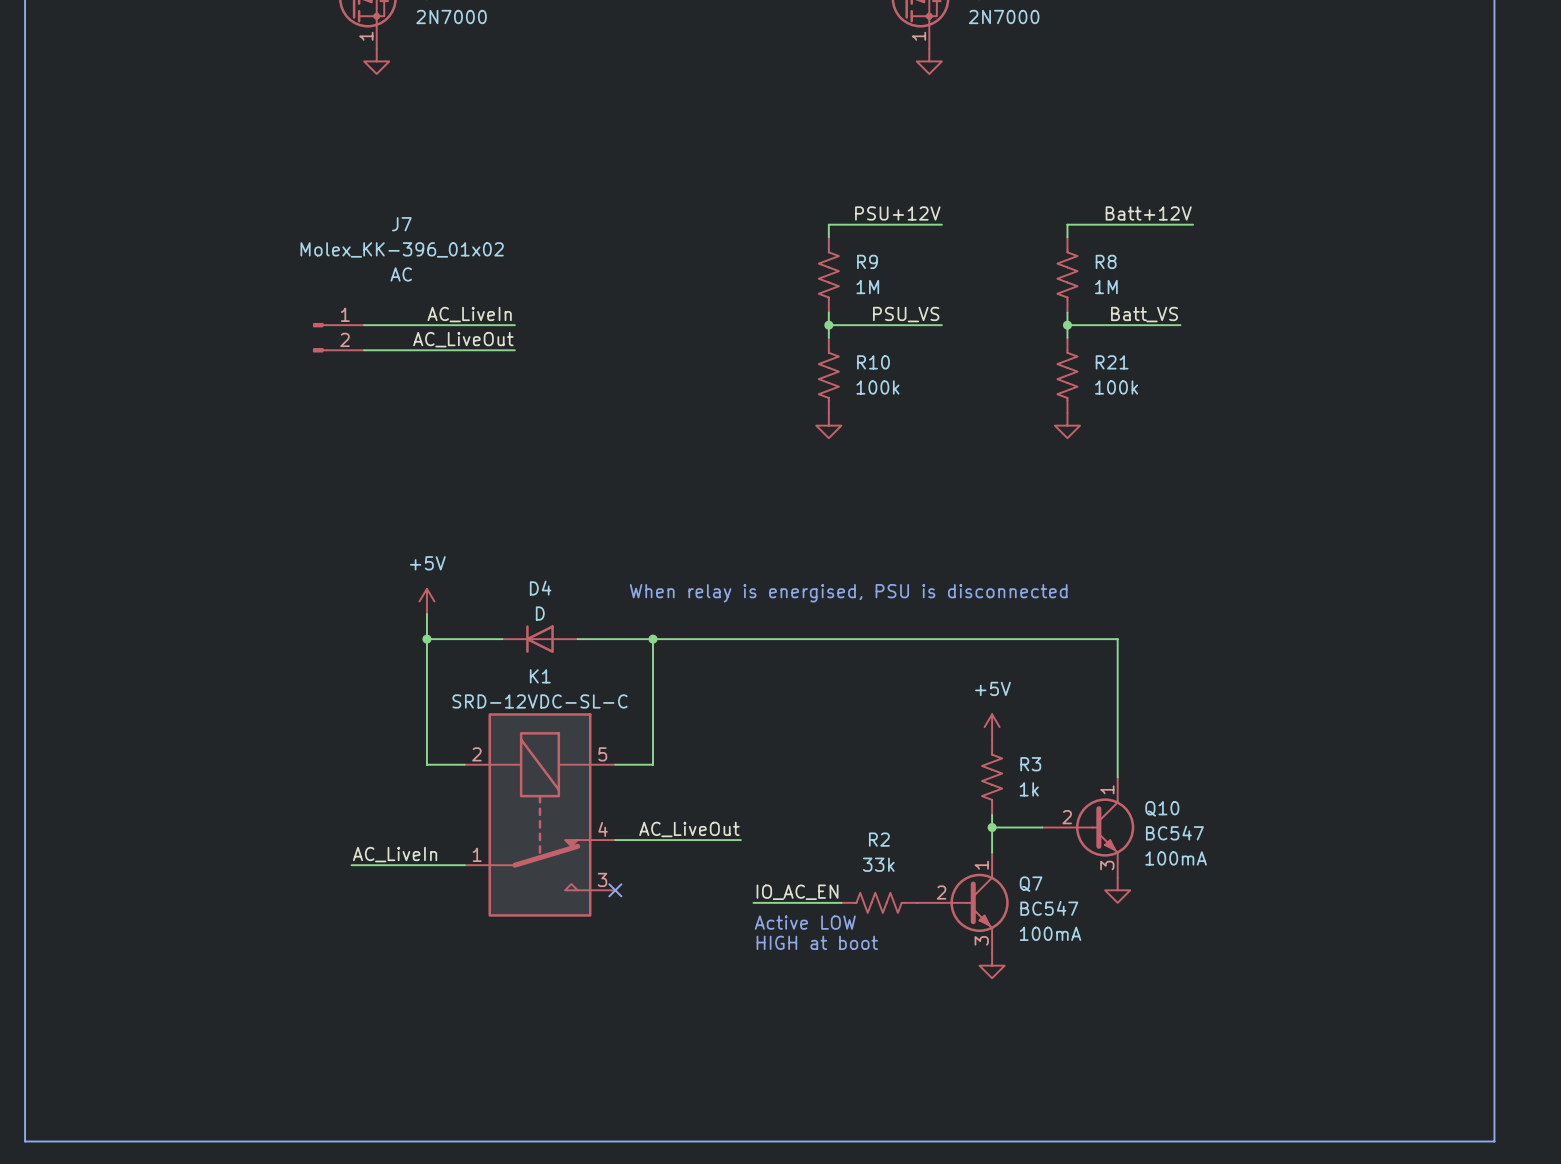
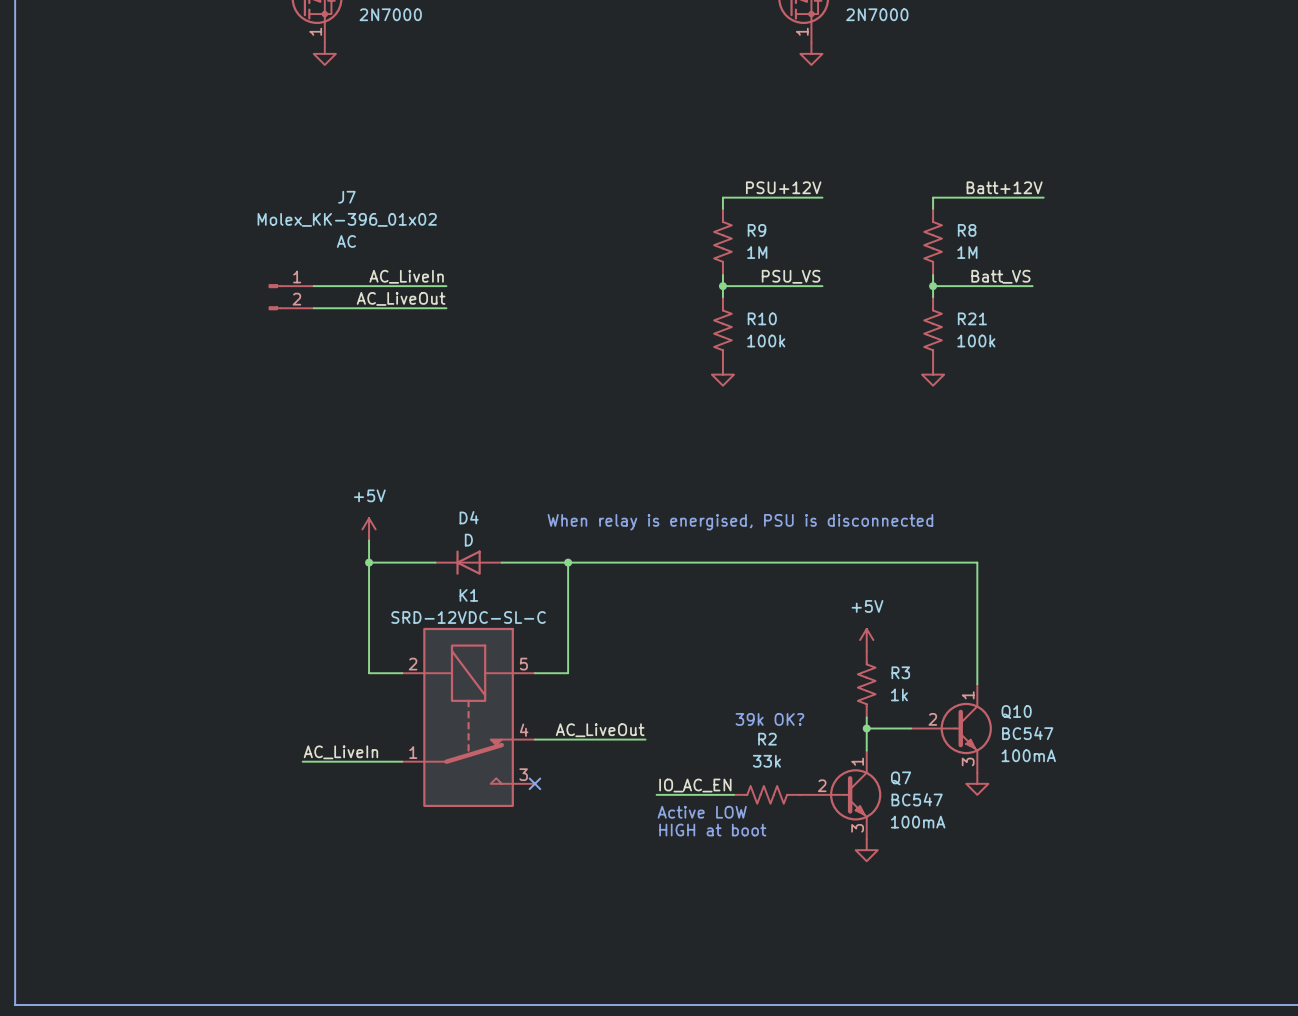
text: none -> 39k OK? (769, 719)

